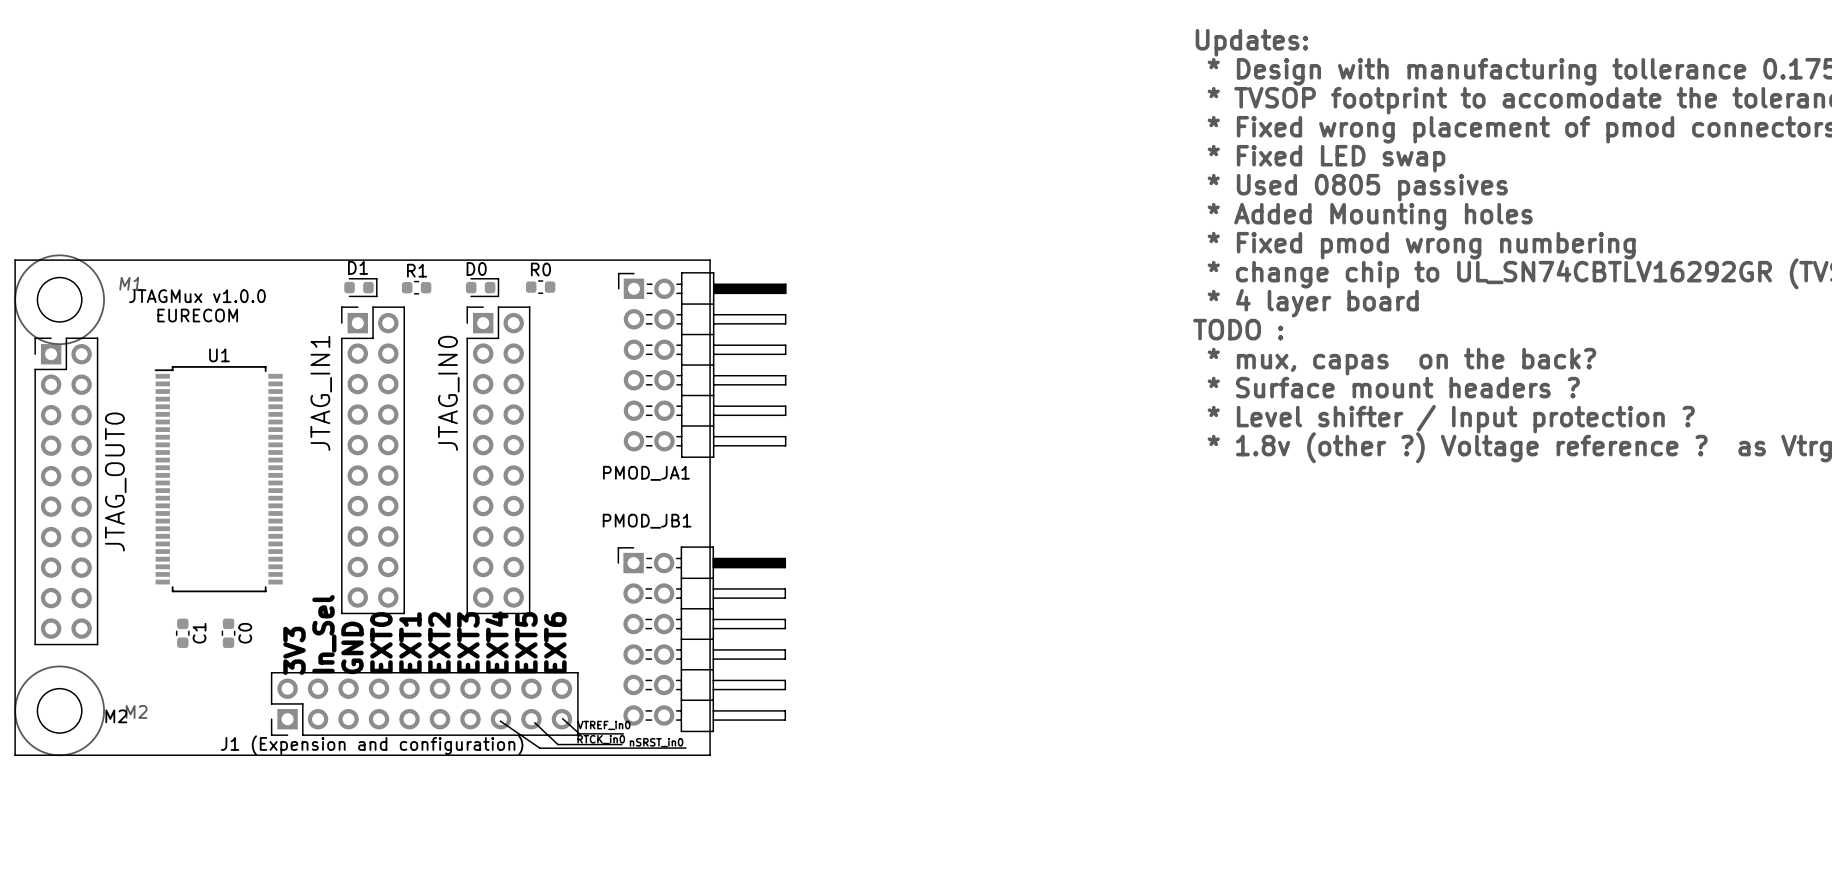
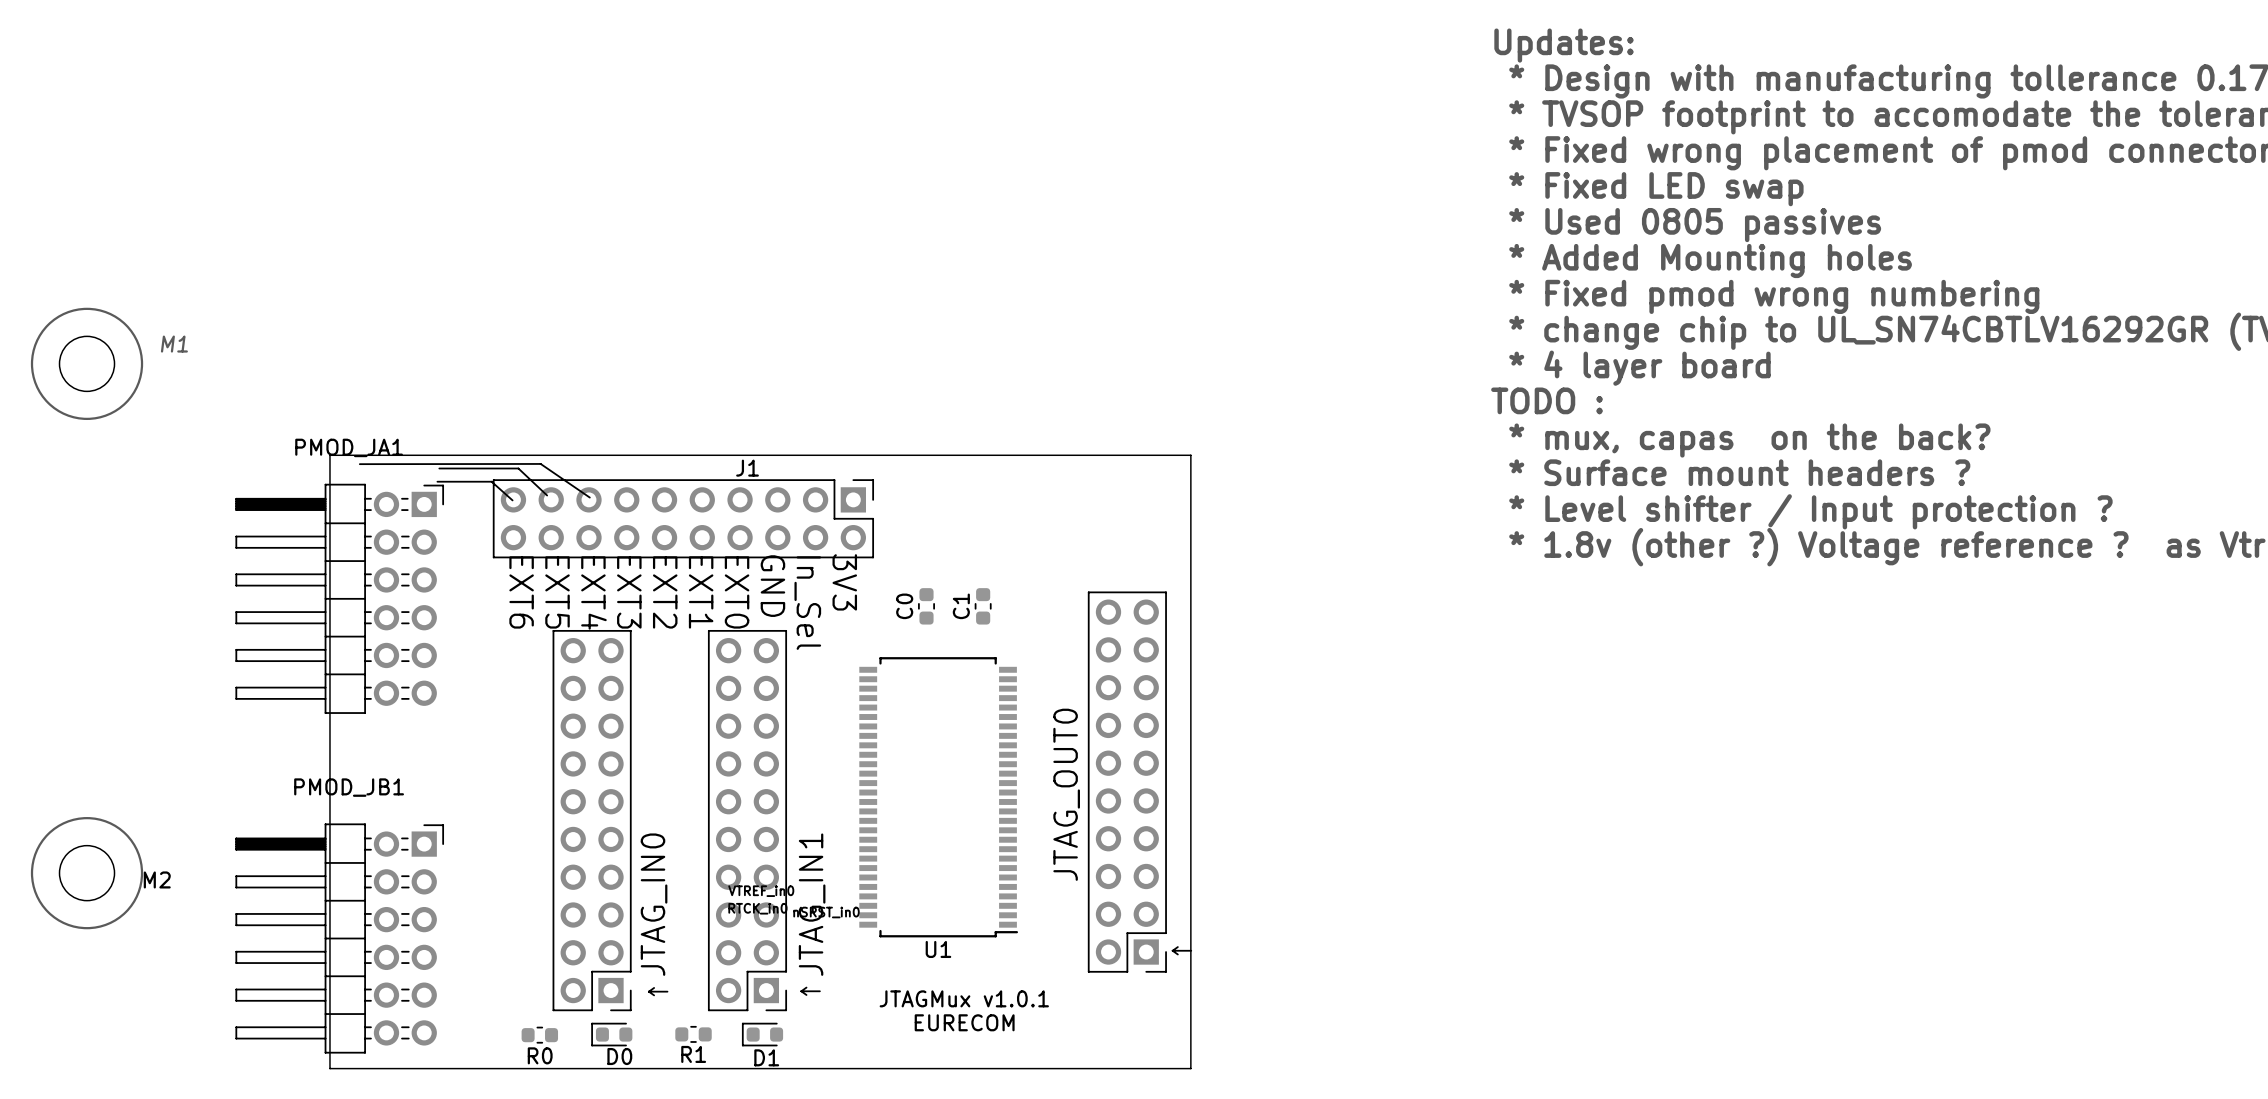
board edge: (15, 260) (710, 260) (710, 755) (15, 755) (15, 260) -> (329, 455) (1190, 455) (1190, 1068) (329, 1068) (329, 455)
R0 name position: R0 (540, 269) -> R0 (540, 1055)
R1 name position: R1 (417, 270) -> R1 (693, 1054)
PMOD_JA1 footprint: [618, 272, 787, 458] -> [235, 483, 445, 714]
D1 rotation: 0° (360, 287) -> 180° (762, 1034)
D1 position: (360, 287) -> (762, 1034)
R1 position: (416, 287) -> (693, 1034)
D0 rotation: 0° (482, 287) -> 180° (611, 1034)
D0 position: (482, 287) -> (611, 1034)
R0 position: (540, 287) -> (539, 1035)
text: JTAGMux v1.0.0 (197, 296) -> none
text: EURECOM (197, 315) -> none
line: none -> (359, 464) (540, 463) (589, 497)
line: none -> (439, 468) (518, 468) (547, 495)
line: none -> (437, 481) (491, 481) (512, 500)
J1: none -> (683, 518)
JTAG_IN1 rotation: 0° (373, 460) -> 180° (747, 820)
JTAG_IN1 position: (373, 460) -> (747, 820)
JTAG_IN0 rotation: 0° (498, 460) -> 180° (592, 820)
JTAG_IN0 position: (498, 460) -> (592, 820)
PMOD_JA1 name position: PMOD_JA1 (646, 473) -> PMOD_JA1 (349, 447)
text: none -> 3V3 (844, 582)
U1 rotation: 0° (218, 479) -> 180° (938, 797)
U1 position: (218, 479) -> (938, 797)
text: none -> GND (772, 586)
text: none -> EXT0 (737, 592)
JTAG_OUT0 rotation: 0° (66, 491) -> 180° (1127, 782)
JTAG_OUT0 position: (66, 491) -> (1127, 782)
text: none -> In_Sel (807, 603)
PMOD_JB1 name position: PMOD_JB1 (647, 521) -> PMOD_JB1 (349, 787)
PMOD_JB1 footprint: [617, 546, 787, 733] -> [235, 823, 445, 1054]
C1 position: (182, 633) -> (983, 606)
C1 name position: C1 (199, 633) -> C1 (961, 606)
C0 position: (228, 633) -> (926, 606)
C0 name position: C0 (245, 633) -> C0 (904, 606)
text: In_Sel (324, 634) -> none
text: EXT0 (381, 642) -> none
text rotation: 0° (410, 642) -> 180° (701, 592)
text position: EXT1 (410, 642) -> EXT1 (701, 592)
text rotation: 0° (439, 642) -> 180° (665, 592)
text position: EXT2 (439, 642) -> EXT2 (665, 592)
text rotation: 0° (468, 642) -> 180° (629, 592)
text position: EXT3 (468, 642) -> EXT3 (629, 592)
text rotation: 0° (496, 642) -> 180° (593, 592)
text position: EXT4 (496, 642) -> EXT4 (593, 592)
text rotation: 0° (526, 642) -> 180° (557, 592)
text position: EXT5 (526, 642) -> EXT5 (557, 592)
text rotation: 0° (555, 642) -> 180° (521, 592)
text position: EXT6 (555, 642) -> EXT6 (521, 592)
text: GND (352, 647) -> none
text: 3V3 (294, 650) -> none
J1 (Expension and configuration): (424, 703) -> none
M2 text: M2 (136, 711) -> none
line: (562, 718) (579, 733) (623, 733) -> none
line: (500, 721) (539, 748) (685, 748) -> none
line: (534, 722) (557, 744) (621, 744) -> none
line: none -> (1177, 947) (1172, 950)
line: none -> (1172, 950) (1177, 954)
line: none -> (1172, 950) (1191, 950)
line: none -> (654, 987) (648, 991)
line: none -> (806, 987) (801, 991)
line: none -> (648, 991) (654, 995)
line: none -> (648, 991) (667, 991)
line: none -> (801, 991) (806, 995)
line: none -> (801, 991) (819, 991)
text: none -> JTAGMux v1.0.1 (964, 998)
text: none -> EURECOM (964, 1022)

